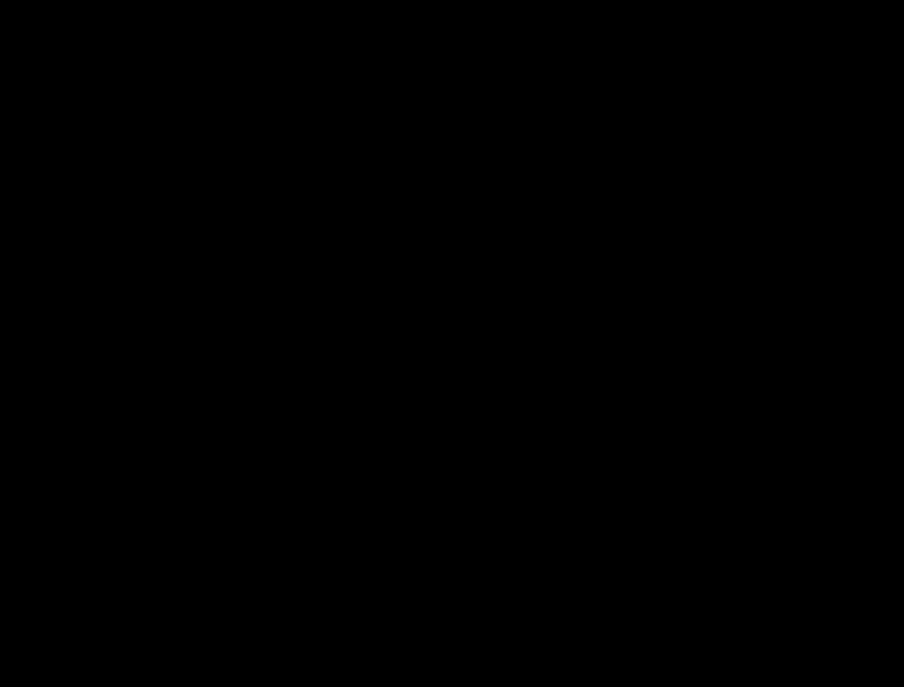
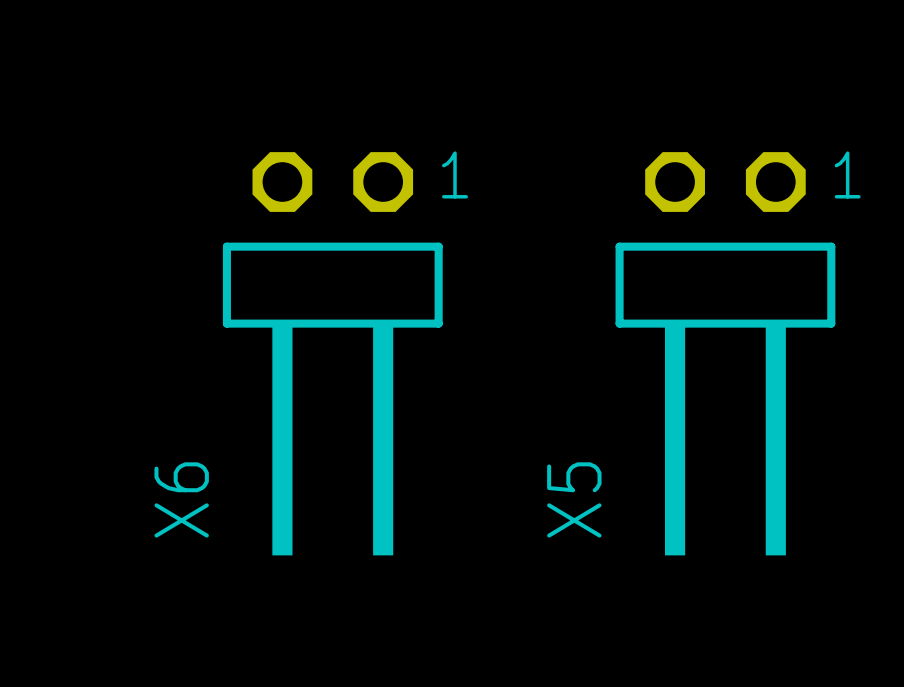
X6: none -> (332, 353)
X5: none -> (725, 353)

